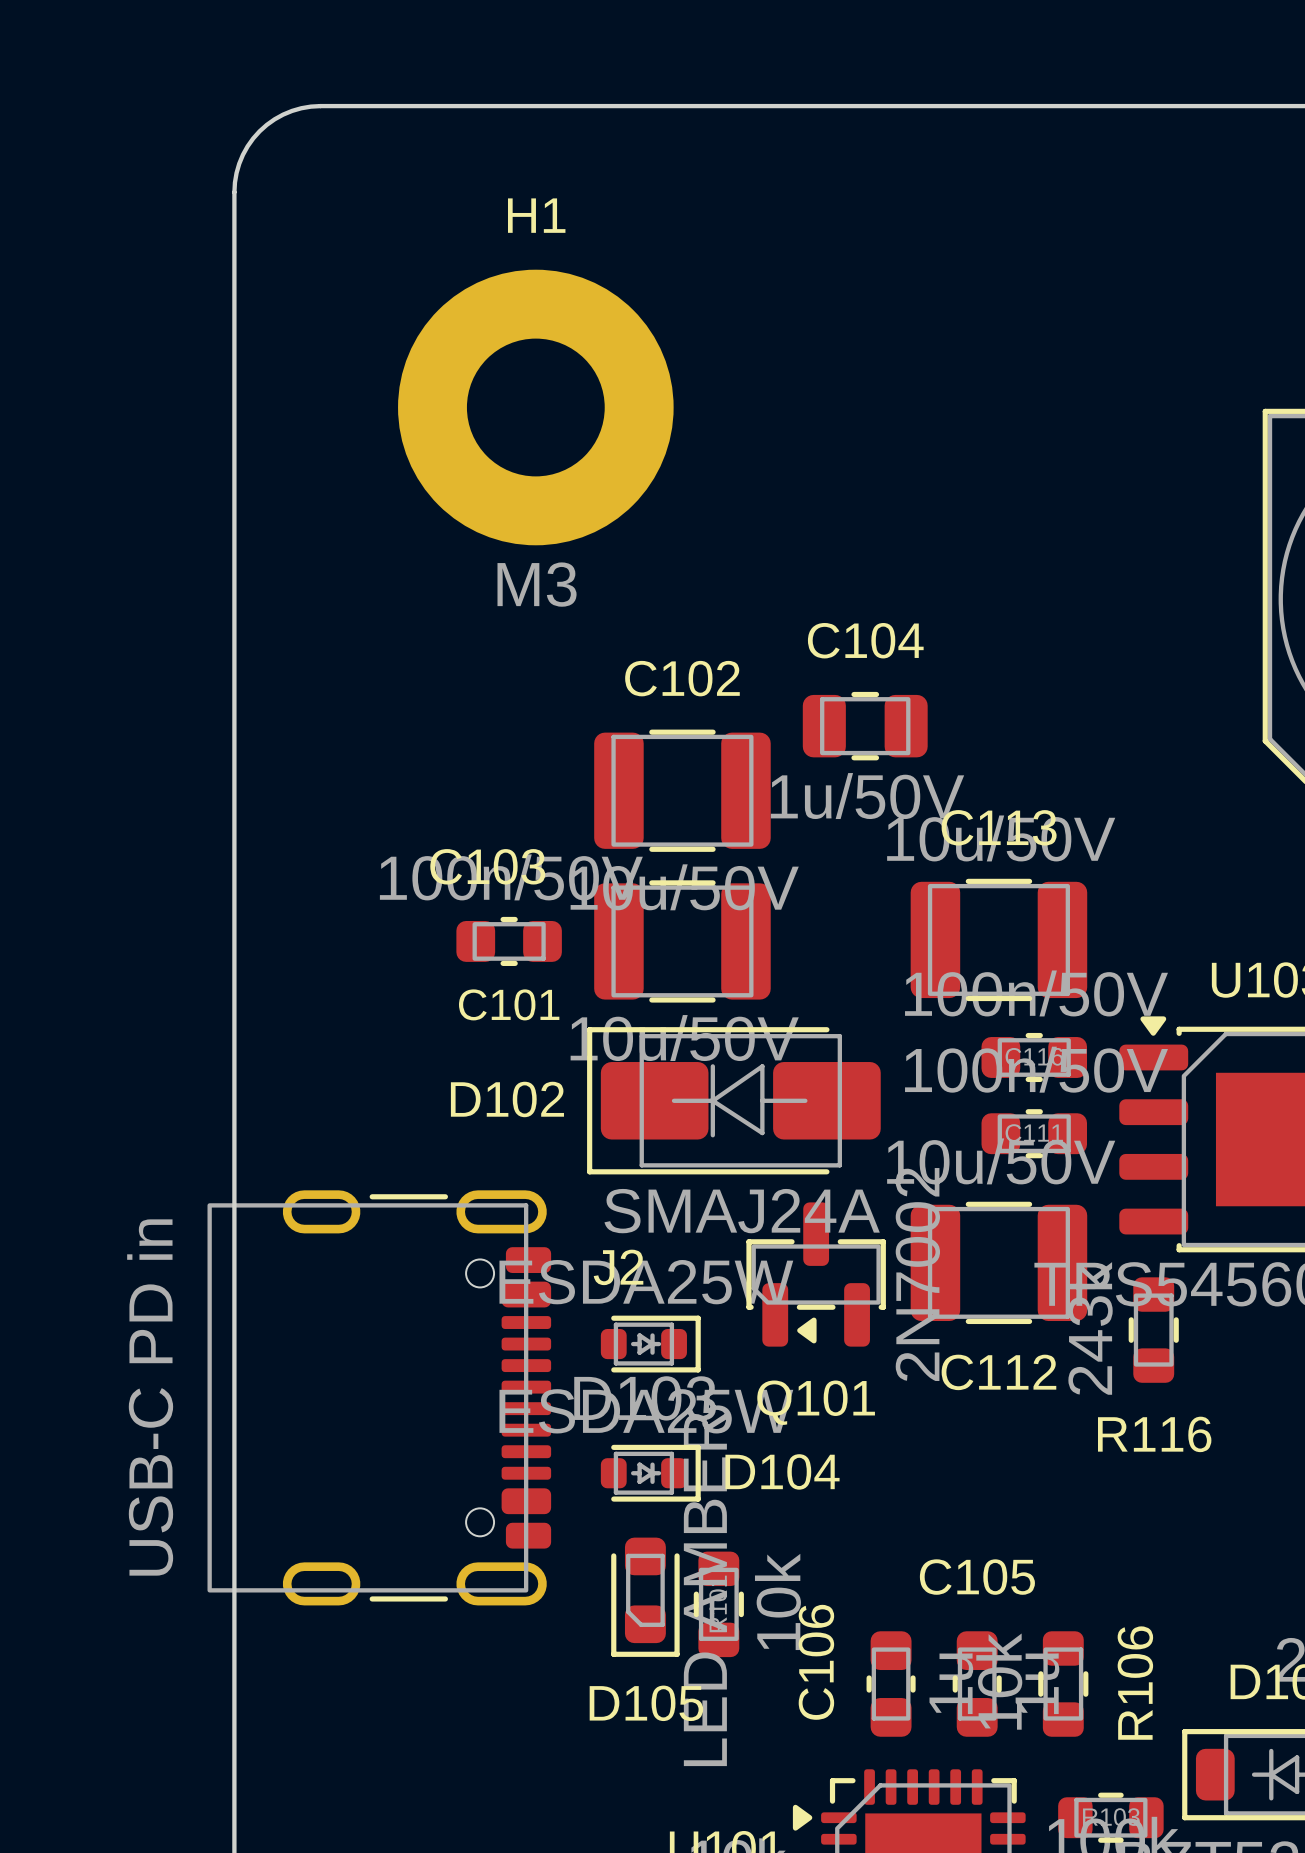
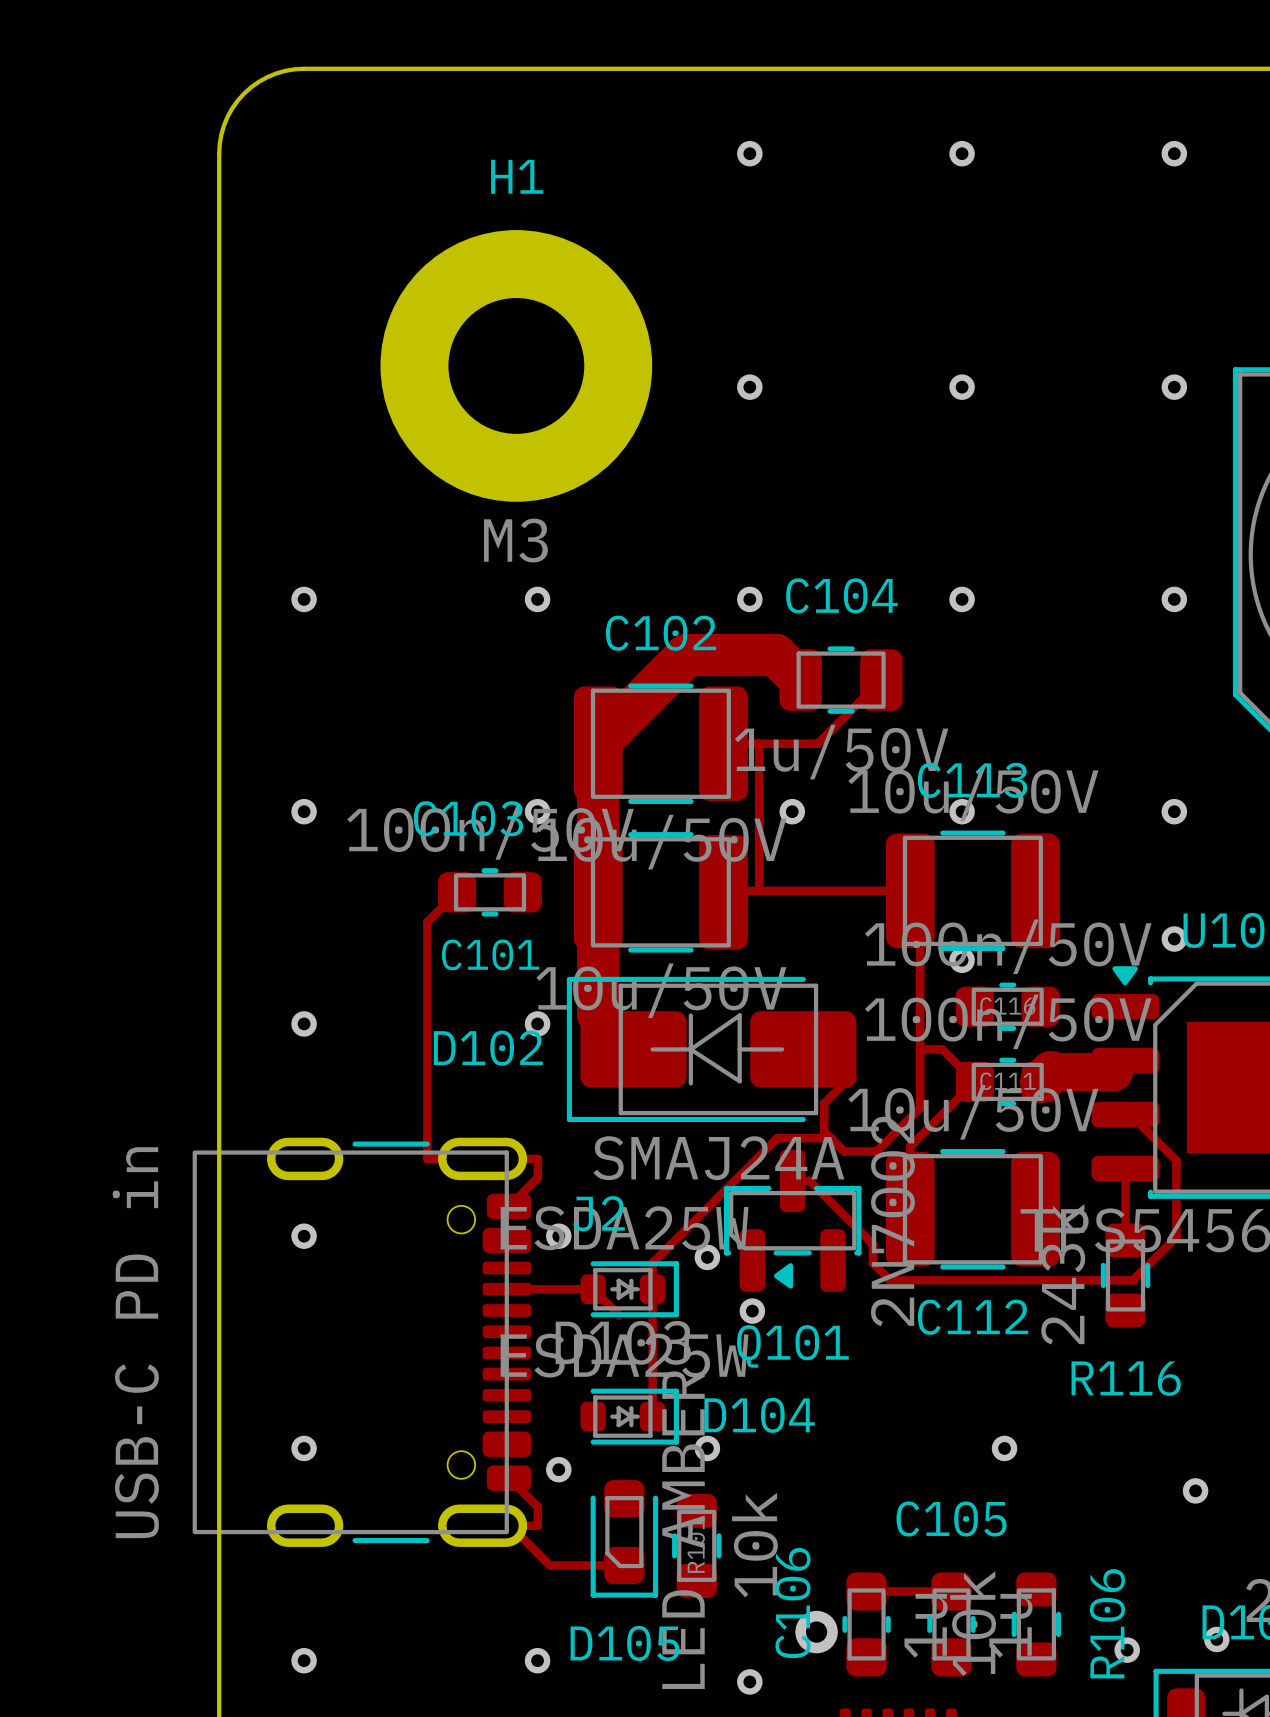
via: none -> (749, 153)
via: none -> (962, 153)
via: none -> (1174, 153)
via: none -> (749, 387)
via: none -> (962, 387)
via: none -> (1174, 387)
via: none -> (304, 599)
via: none -> (537, 599)
via: none -> (749, 599)
via: none -> (962, 599)
via: none -> (1174, 599)
track: none -> (800, 680) (775, 655) (687, 655) (598, 743) (598, 1014) (633, 1049)
track: none -> (881, 680) (817, 743) (723, 743)
track: none -> (759, 743) (759, 890)
via: none -> (304, 811)
via: none -> (537, 811)
via: none -> (792, 811)
via: none -> (962, 811)
via: none -> (1174, 811)
track: none -> (457, 892) (427, 922) (427, 1158) (537, 1158) (537, 1177) (509, 1206)
track: none -> (723, 892) (910, 890) (920, 900) (920, 1107) (876, 1151) (844, 1151) (824, 1131) (824, 1103) (844, 1083) (848, 1083) (852, 1076) (830, 1076) (803, 1049)
via: none -> (1174, 939)
via: none -> (962, 960)
via: none -> (304, 1023)
via: none -> (537, 1023)
track: none -> (920, 1049) (942, 1049) (974, 1081) (910, 1146) (910, 1209)
track: none -> (1125, 1060) (1114, 1072) (1051, 1072) (1041, 1081)
track: none -> (1125, 1114) (1130, 1114) (1176, 1160) (1176, 1236) (1133, 1280) (890, 1280) (872, 1263) (872, 1244) (809, 1180) (792, 1180)
track: none -> (830, 1138) (777, 1138) (652, 1263) (652, 1416)
track: none -> (1125, 1168) (1125, 1240)
via: none -> (304, 1236)
via: none -> (558, 1236)
via: none -> (707, 1257)
track: none -> (507, 1289) (593, 1289) (619, 1315)
via: none -> (752, 1311)
via: none -> (304, 1448)
via: none -> (707, 1448)
via: none -> (1004, 1448)
via: none -> (558, 1469)
track: none -> (509, 1478) (537, 1506) (537, 1525) (482, 1525)
via: none -> (1195, 1490)
track: none -> (510, 1525) (550, 1565) (624, 1565)
track: none -> (866, 1591) (951, 1591)
via: none -> (816, 1632)
via: none -> (1216, 1639)
via: none -> (1127, 1650)
via: none -> (304, 1660)
via: none -> (537, 1660)
via: none -> (749, 1681)

